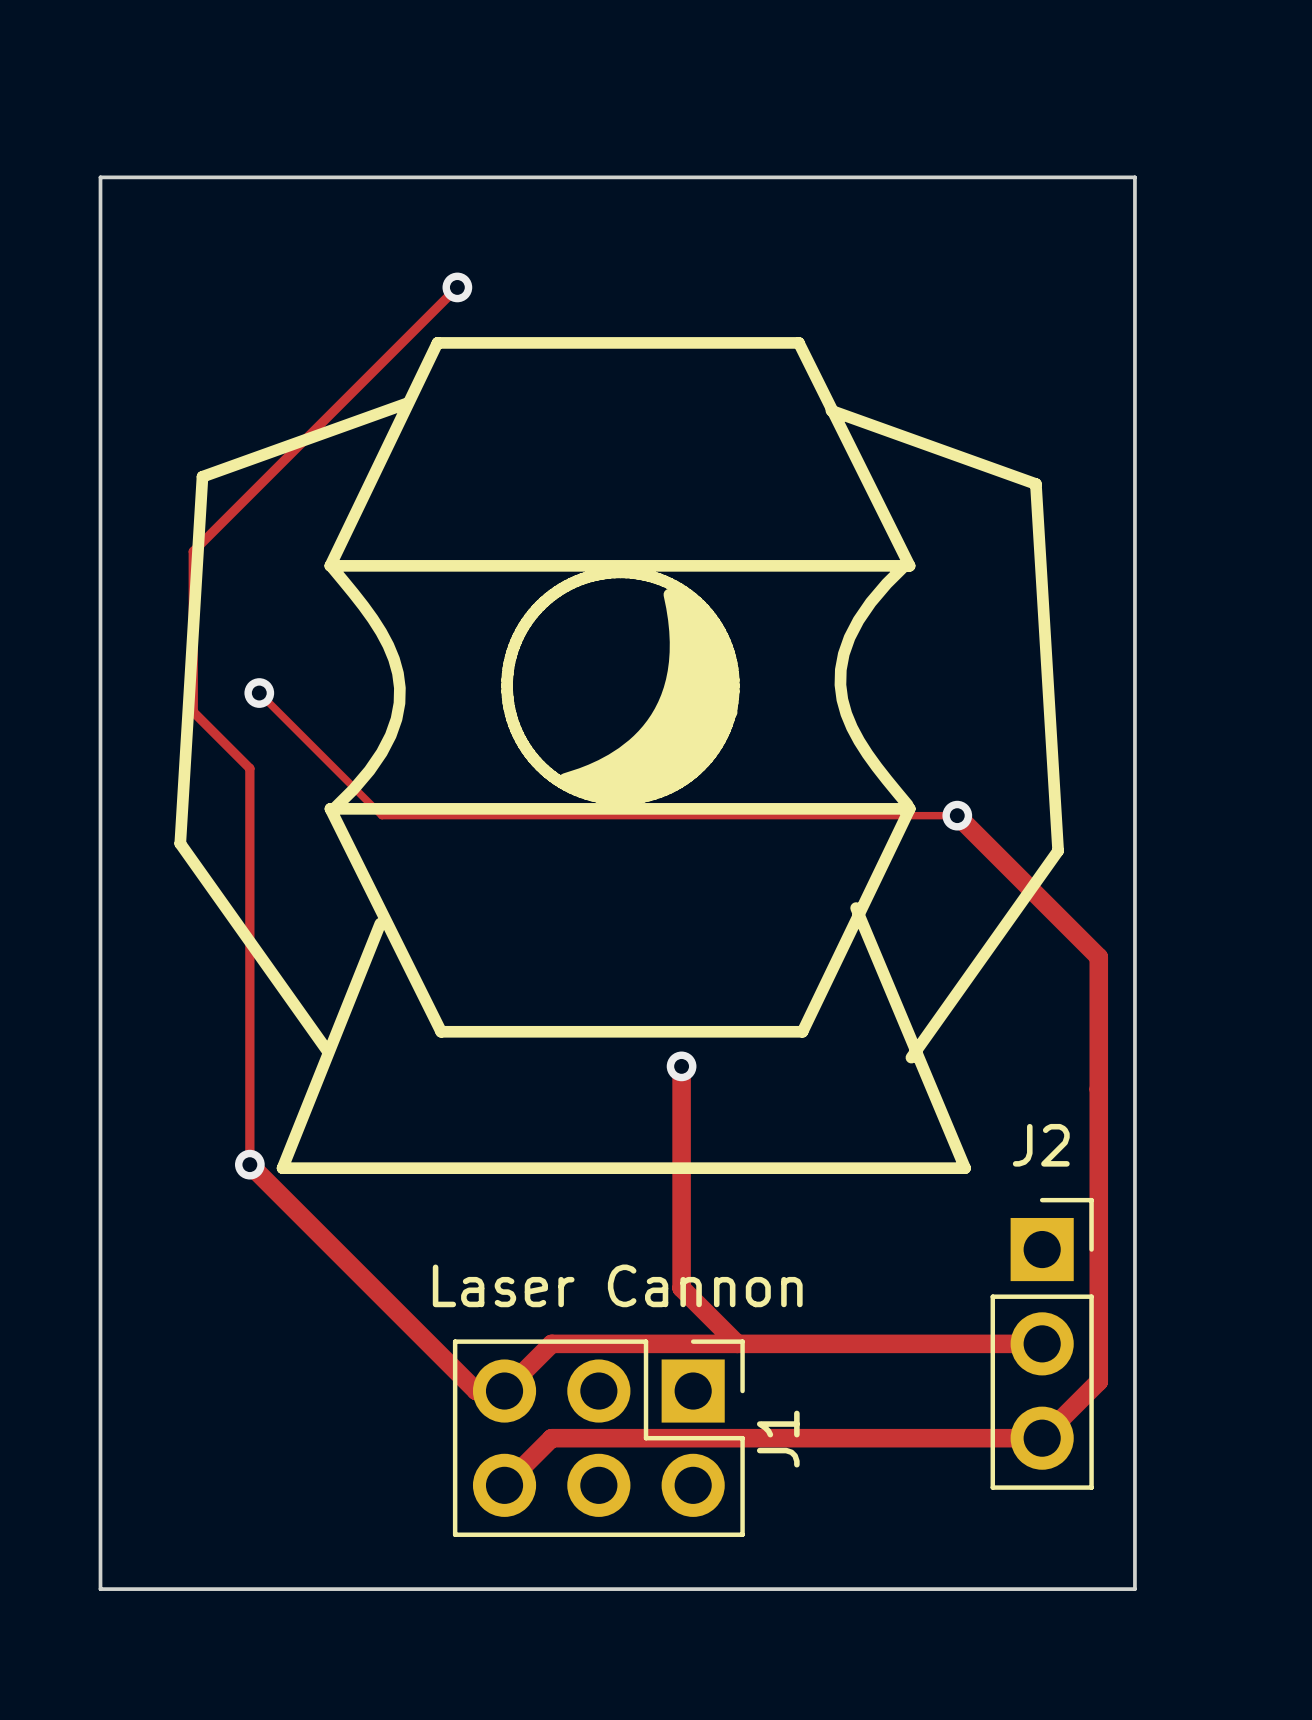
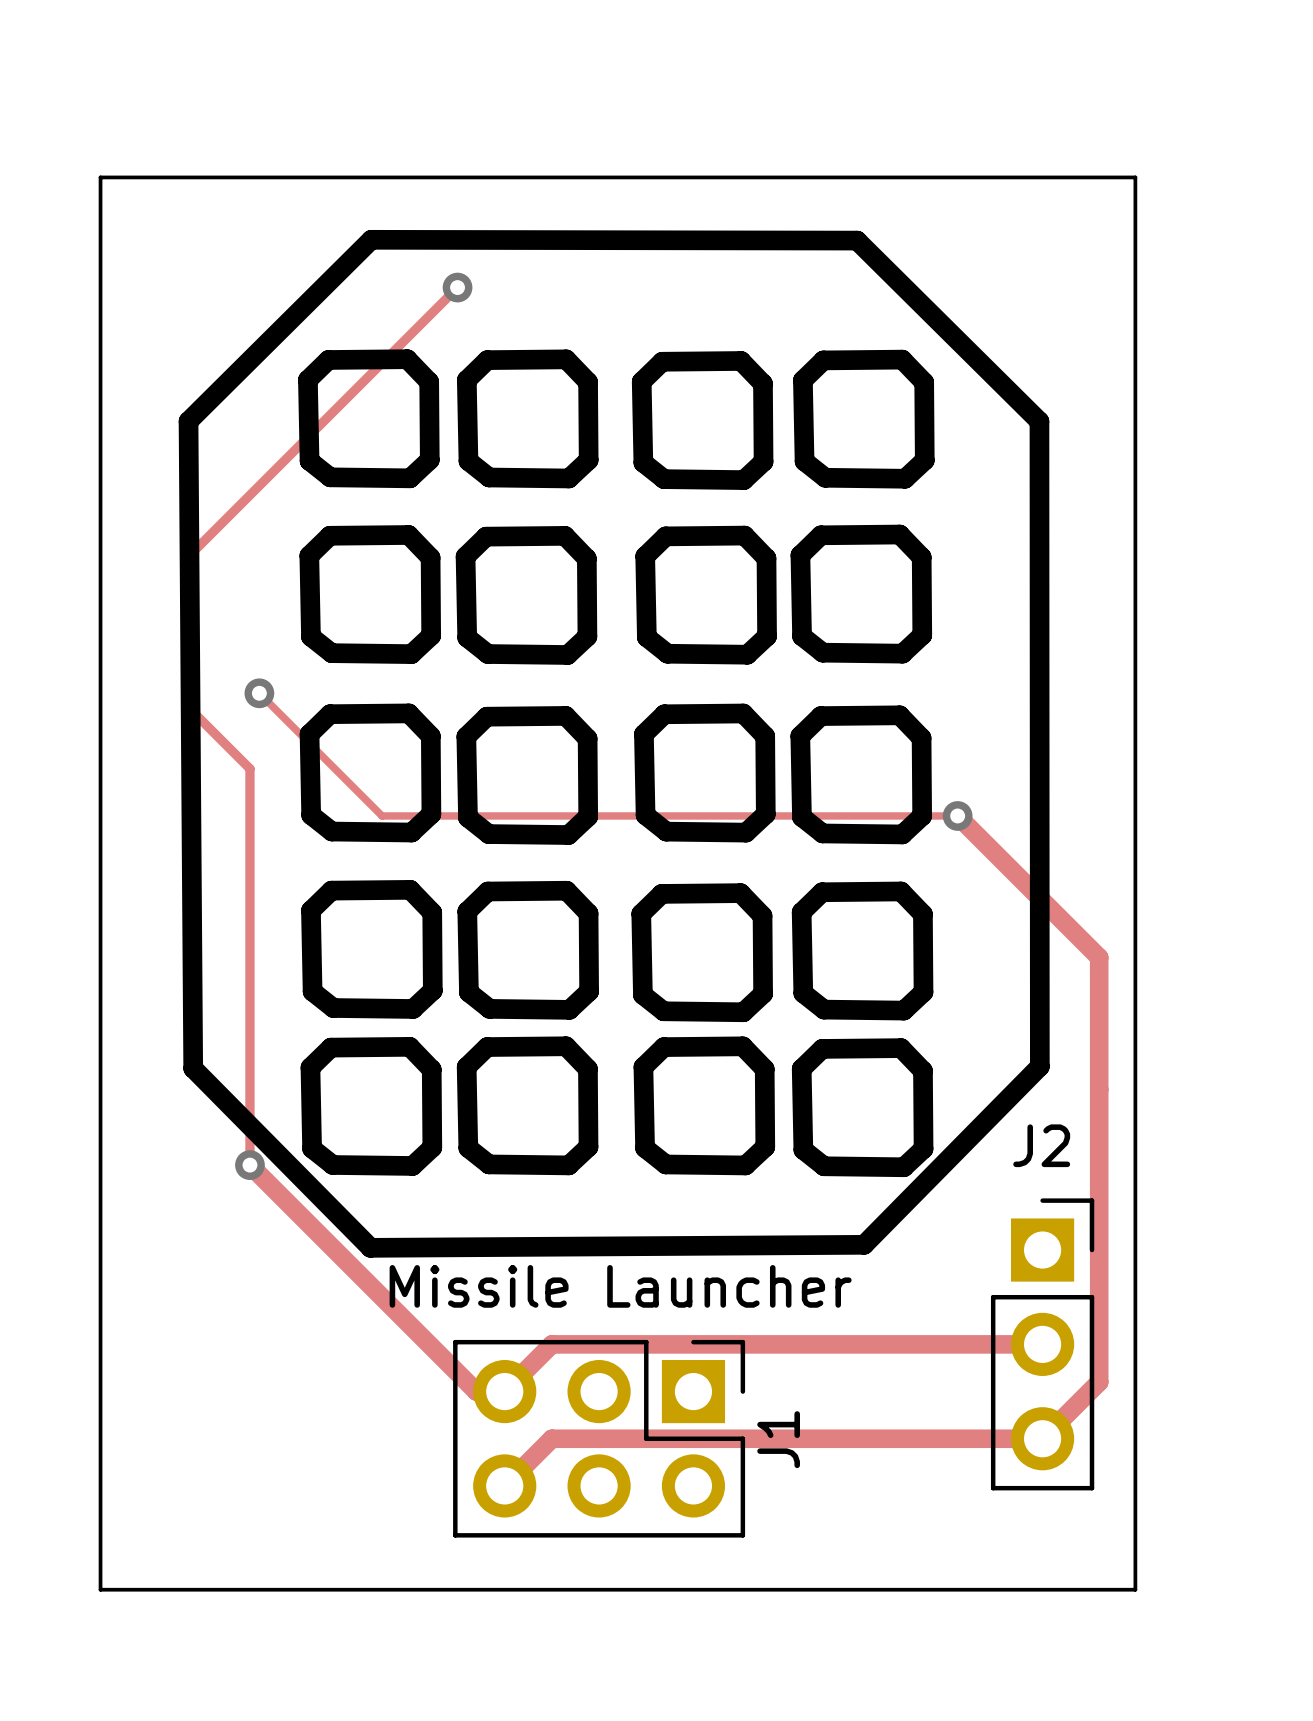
line: none -> (371, 239) (857, 240) (1039, 421) (1039, 1066) (864, 1244) (370, 1247) (193, 1068) (188, 421) (371, 239)
line: (437, 342) (330, 565) (909, 565) (798, 342) (437, 342) -> none
line: none -> (407, 359) (328, 359) (307, 379) (309, 460) (330, 477) (410, 478) (429, 459) (429, 381) (407, 359)
line: none -> (566, 359) (487, 360) (466, 380) (468, 461) (489, 477) (568, 478) (588, 460) (588, 382) (566, 359)
line: none -> (902, 359) (924, 382) (924, 460) (905, 478) (825, 477) (804, 461) (802, 380) (823, 360) (902, 359)
line: none -> (741, 360) (762, 383) (763, 461) (743, 480) (664, 479) (643, 462) (641, 381) (662, 361) (741, 360)
line: (407, 403) (202, 476) (180, 843) (327, 1050) -> none
line: (831, 410) (1035, 484) (1058, 850) (911, 1057) -> none
line: none -> (408, 534) (430, 557) (431, 635) (411, 654) (331, 653) (310, 636) (309, 555) (329, 535) (408, 534)
line: none -> (899, 534) (820, 535) (800, 555) (802, 636) (822, 652) (902, 653) (922, 635) (921, 557) (899, 534)
line: none -> (564, 535) (486, 536) (465, 556) (467, 637) (487, 654) (567, 655) (587, 636) (586, 558) (564, 535)
line: none -> (744, 535) (665, 536) (645, 556) (646, 637) (667, 653) (747, 654) (767, 636) (766, 558) (744, 535)
line: (906, 563) (886, 583) (858, 620) (843, 654) (840, 684) (846, 713) (859, 740) (876, 767) (907, 805) -> none
line: (332, 567) (363, 605) (381, 632) (394, 659) (399, 688) (396, 718) (381, 752) (353, 789) (333, 809) -> none
line: (614, 572) (592, 575) (571, 583) (552, 594) (536, 609) (523, 626) (513, 646) (508, 668) (507, 691) (510, 714) (518, 734) (529, 753) (544, 769) (561, 782) (581, 792) (603, 797) (626, 798) (648, 795) (669, 787) (688, 776) (704, 761) (717, 744) (726, 724) (732, 702) (733, 679) (730, 657) (722, 636) (711, 617) (696, 601) (679, 588) (659, 579) (637, 573) (614, 572) -> none
drawing: [559, 588, 738, 802] -> none
line: none -> (408, 713) (330, 714) (309, 734) (311, 815) (331, 831) (411, 832) (431, 814) (430, 736) (408, 713)
line: none -> (743, 713) (664, 714) (643, 734) (645, 815) (666, 831) (746, 832) (765, 814) (765, 736) (743, 713)
line: none -> (565, 715) (587, 738) (588, 816) (568, 835) (488, 834) (467, 817) (466, 736) (486, 716) (565, 715)
line: none -> (899, 715) (921, 738) (922, 816) (902, 834) (822, 833) (801, 817) (800, 736) (820, 716) (899, 715)
line: (330, 808) (441, 1031) (802, 1031) (909, 808) (330, 808) -> none
line: none -> (410, 889) (432, 912) (432, 990) (413, 1008) (333, 1007) (312, 991) (310, 910) (331, 890) (410, 889)
line: none -> (566, 890) (588, 913) (589, 991) (569, 1009) (489, 1008) (468, 992) (467, 911) (487, 891) (566, 890)
line: none -> (901, 891) (822, 892) (801, 912) (803, 993) (823, 1009) (903, 1010) (923, 992) (922, 914) (901, 891)
line: none -> (740, 893) (762, 915) (763, 993) (743, 1012) (663, 1011) (642, 994) (641, 913) (661, 893) (740, 893)
line: (856, 908) (965, 1168) (282, 1168) (380, 923) -> none
line: none -> (566, 1046) (487, 1047) (466, 1067) (468, 1148) (489, 1164) (568, 1165) (588, 1147) (587, 1069) (566, 1046)
line: none -> (742, 1046) (663, 1047) (643, 1067) (645, 1148) (665, 1164) (745, 1165) (765, 1147) (764, 1069) (742, 1046)
line: none -> (409, 1046) (431, 1069) (432, 1147) (412, 1165) (332, 1164) (312, 1148) (310, 1067) (330, 1047) (409, 1046)
line: none -> (901, 1048) (922, 1070) (923, 1148) (903, 1167) (824, 1166) (803, 1149) (801, 1068) (822, 1048) (901, 1048)
track: (681, 1066) (681, 1288) (737, 1343) -> none
via: (681, 1066) -> none
text: Laser Cannon (617, 1285) -> Missile Launcher (620, 1286)

